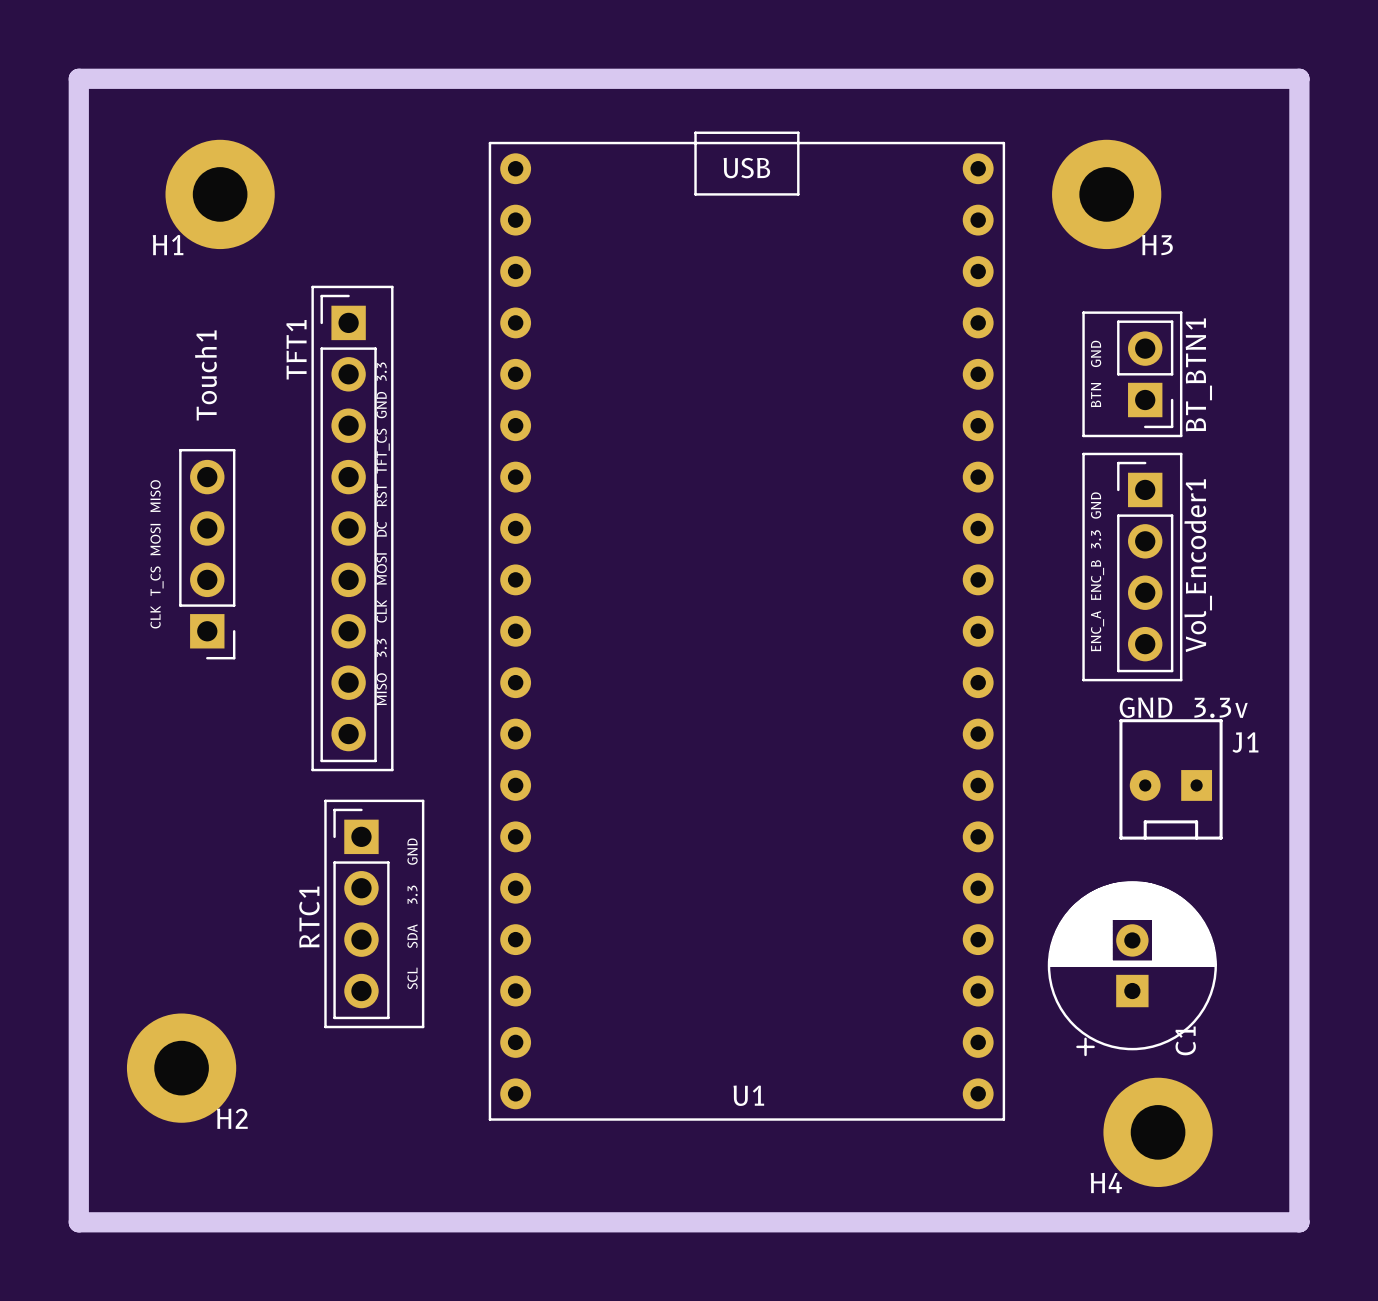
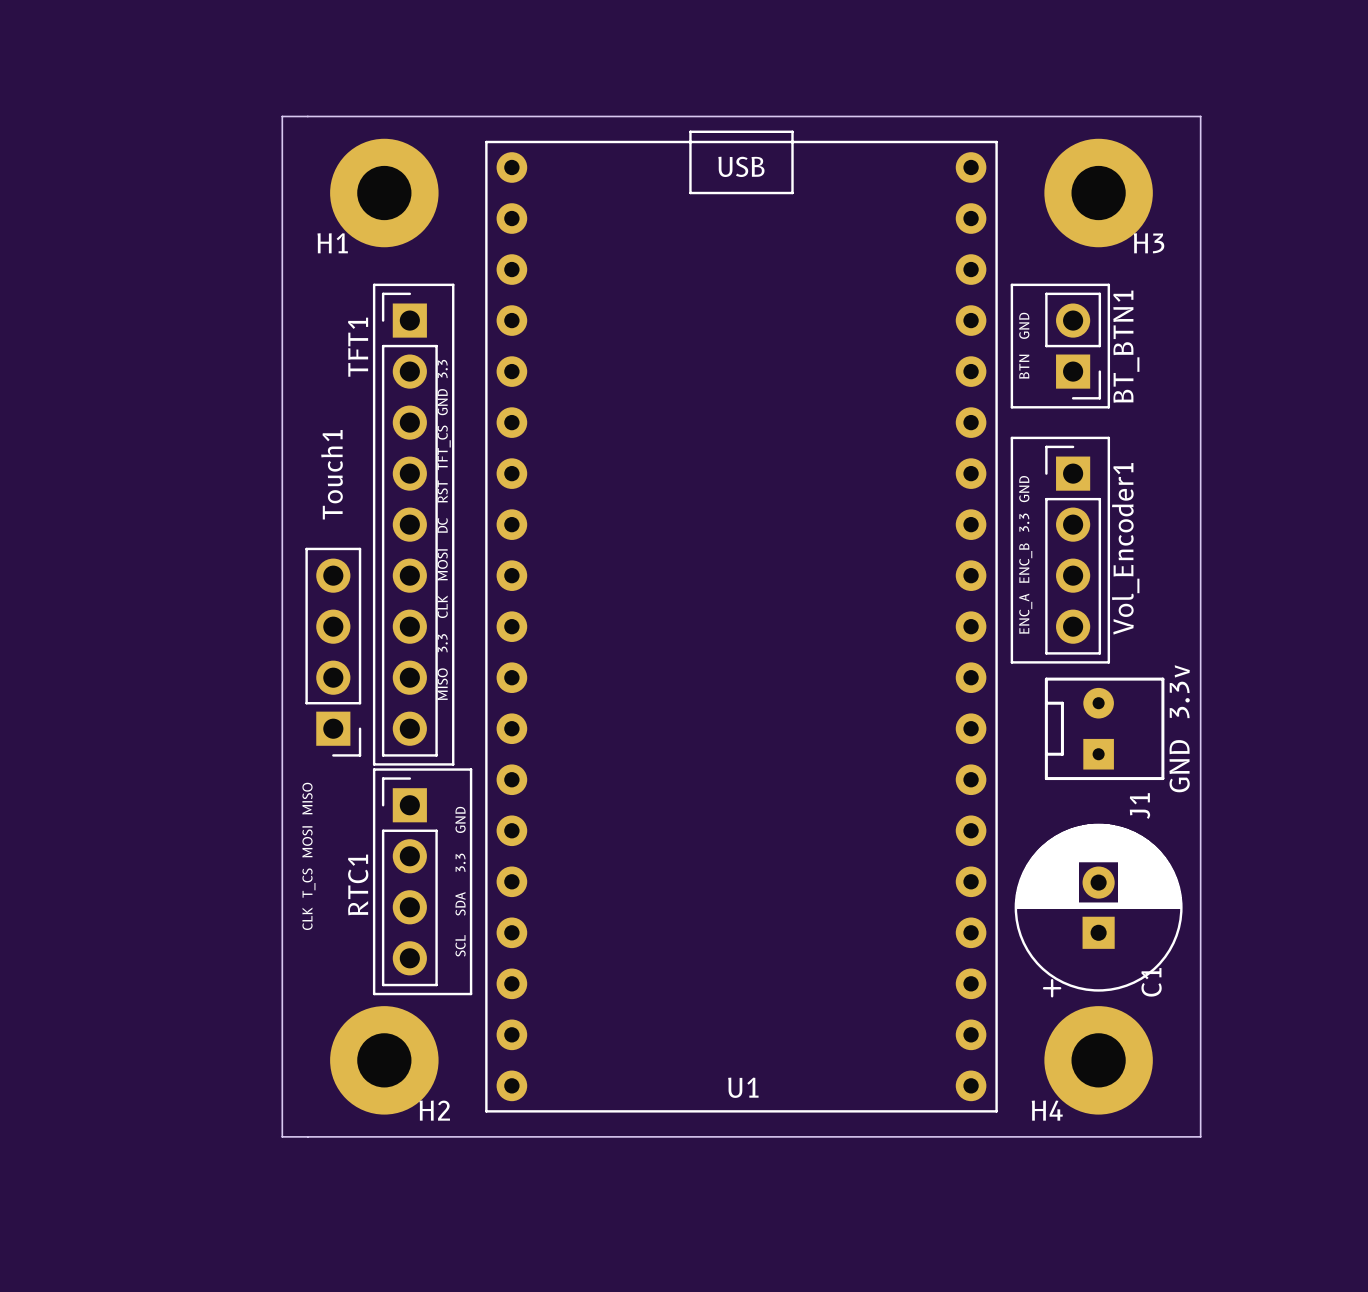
board edge: (78, 78) (1299, 78) (1299, 1222) (78, 1222) (78, 78) -> (282, 116) (282, 1136) (1200, 1136) (1200, 116) (282, 116)
H1 position: (220, 194) -> (384, 193)
line: (376, 286) (312, 286) (312, 770) (376, 770) -> (374, 284) (374, 764)
line: (392, 286) (392, 770) -> (389, 284) (453, 284) (453, 764) (389, 764)
line: (1083, 312) (1083, 435) (1181, 435) (1181, 312) (1083, 312) -> (1011, 284) (1011, 407) (1108, 407) (1108, 284) (1011, 284)
text position: BTN GND (1096, 373) -> BTN GND (1024, 345)
BT_BTN1 position: (1145, 374) -> (1073, 346)
line: (1083, 453) (1083, 680) (1181, 680) (1181, 453) (1083, 453) -> (1011, 437) (1011, 662) (1108, 662) (1108, 437) (1011, 437)
TFT1 position: (348, 528) -> (409, 524)
text position: MISO 3.3 CLK MOSI DC RST TFT_CS GND 3.3 (383, 533) -> MISO 3.3 CLK MOSI DC RST TFT_CS GND 3.3 (444, 529)
text position: CLK T_CS MOSI MISO (157, 554) -> CLK T_CS MOSI MISO (308, 856)
Touch1 position: (207, 554) -> (333, 652)
Vol_Encoder1 position: (1145, 567) -> (1073, 550)
text position: ENC_A ENC_B 3.3 GND (1097, 571) -> ENC_A ENC_B 3.3 GND (1025, 554)
text rotation: 0° (1183, 707) -> 90° counterclockwise (1179, 728)
J1 rotation: 0° (1171, 779) -> 90° clockwise (1104, 728)
J1 position: (1171, 779) -> (1104, 728)
line: (325, 800) (325, 1027) (423, 1027) (423, 800) (325, 800) -> (374, 769) (374, 994) (471, 994) (471, 769) (374, 769)
RTC1 position: (361, 913) -> (409, 881)
text position: SCL SDA 3.3 GND (412, 913) -> SCL SDA 3.3 GND (460, 881)
C1 position: (1132, 968) -> (1098, 910)
H2 position: (181, 1068) -> (384, 1060)
H4 position: (1158, 1132) -> (1098, 1060)

